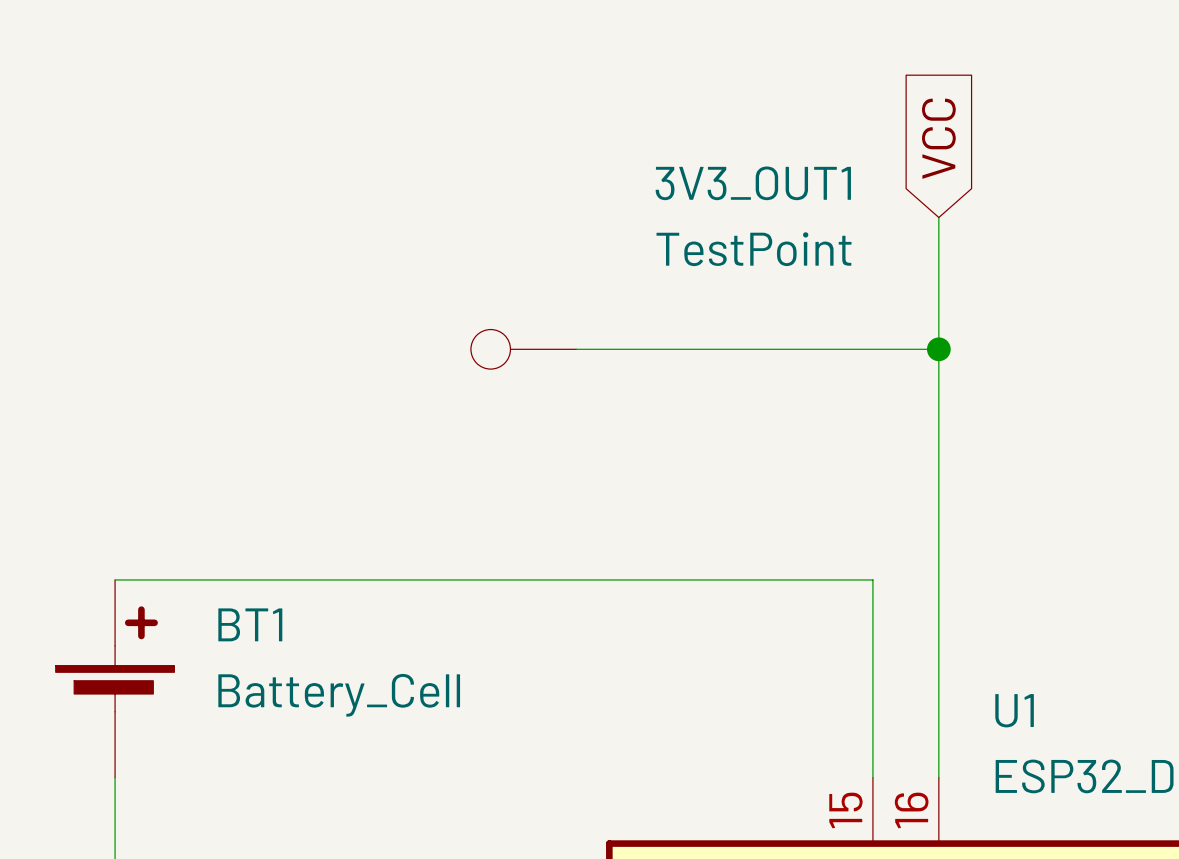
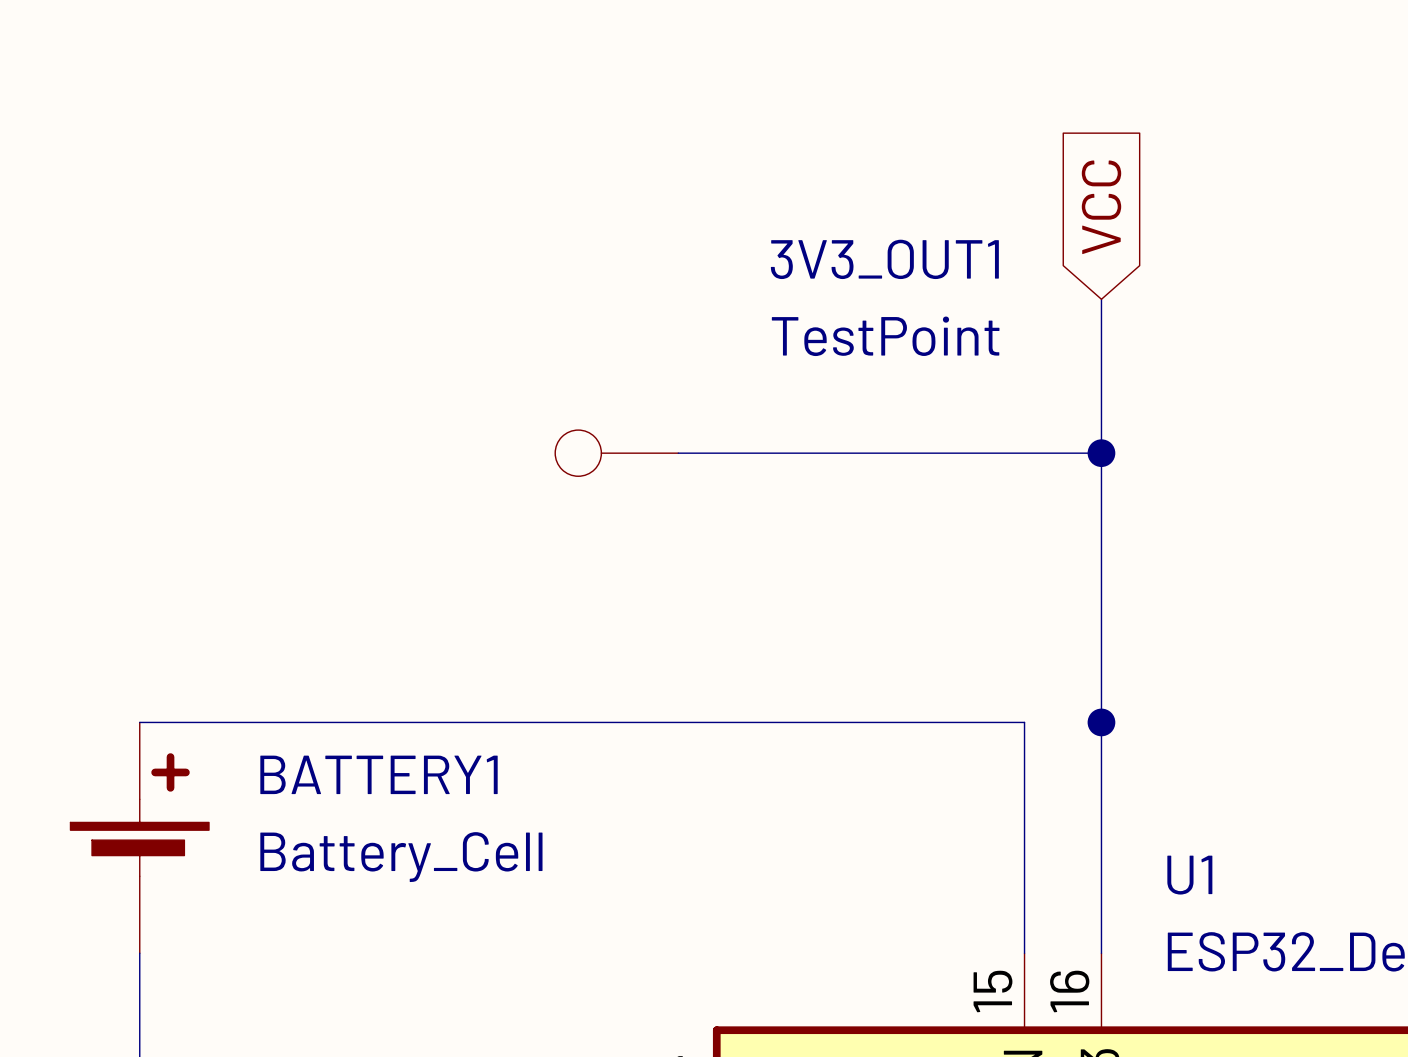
junction: none -> (1101, 722)
BT1 name: BT1 (250, 624) -> BATTERY1 (379, 774)

